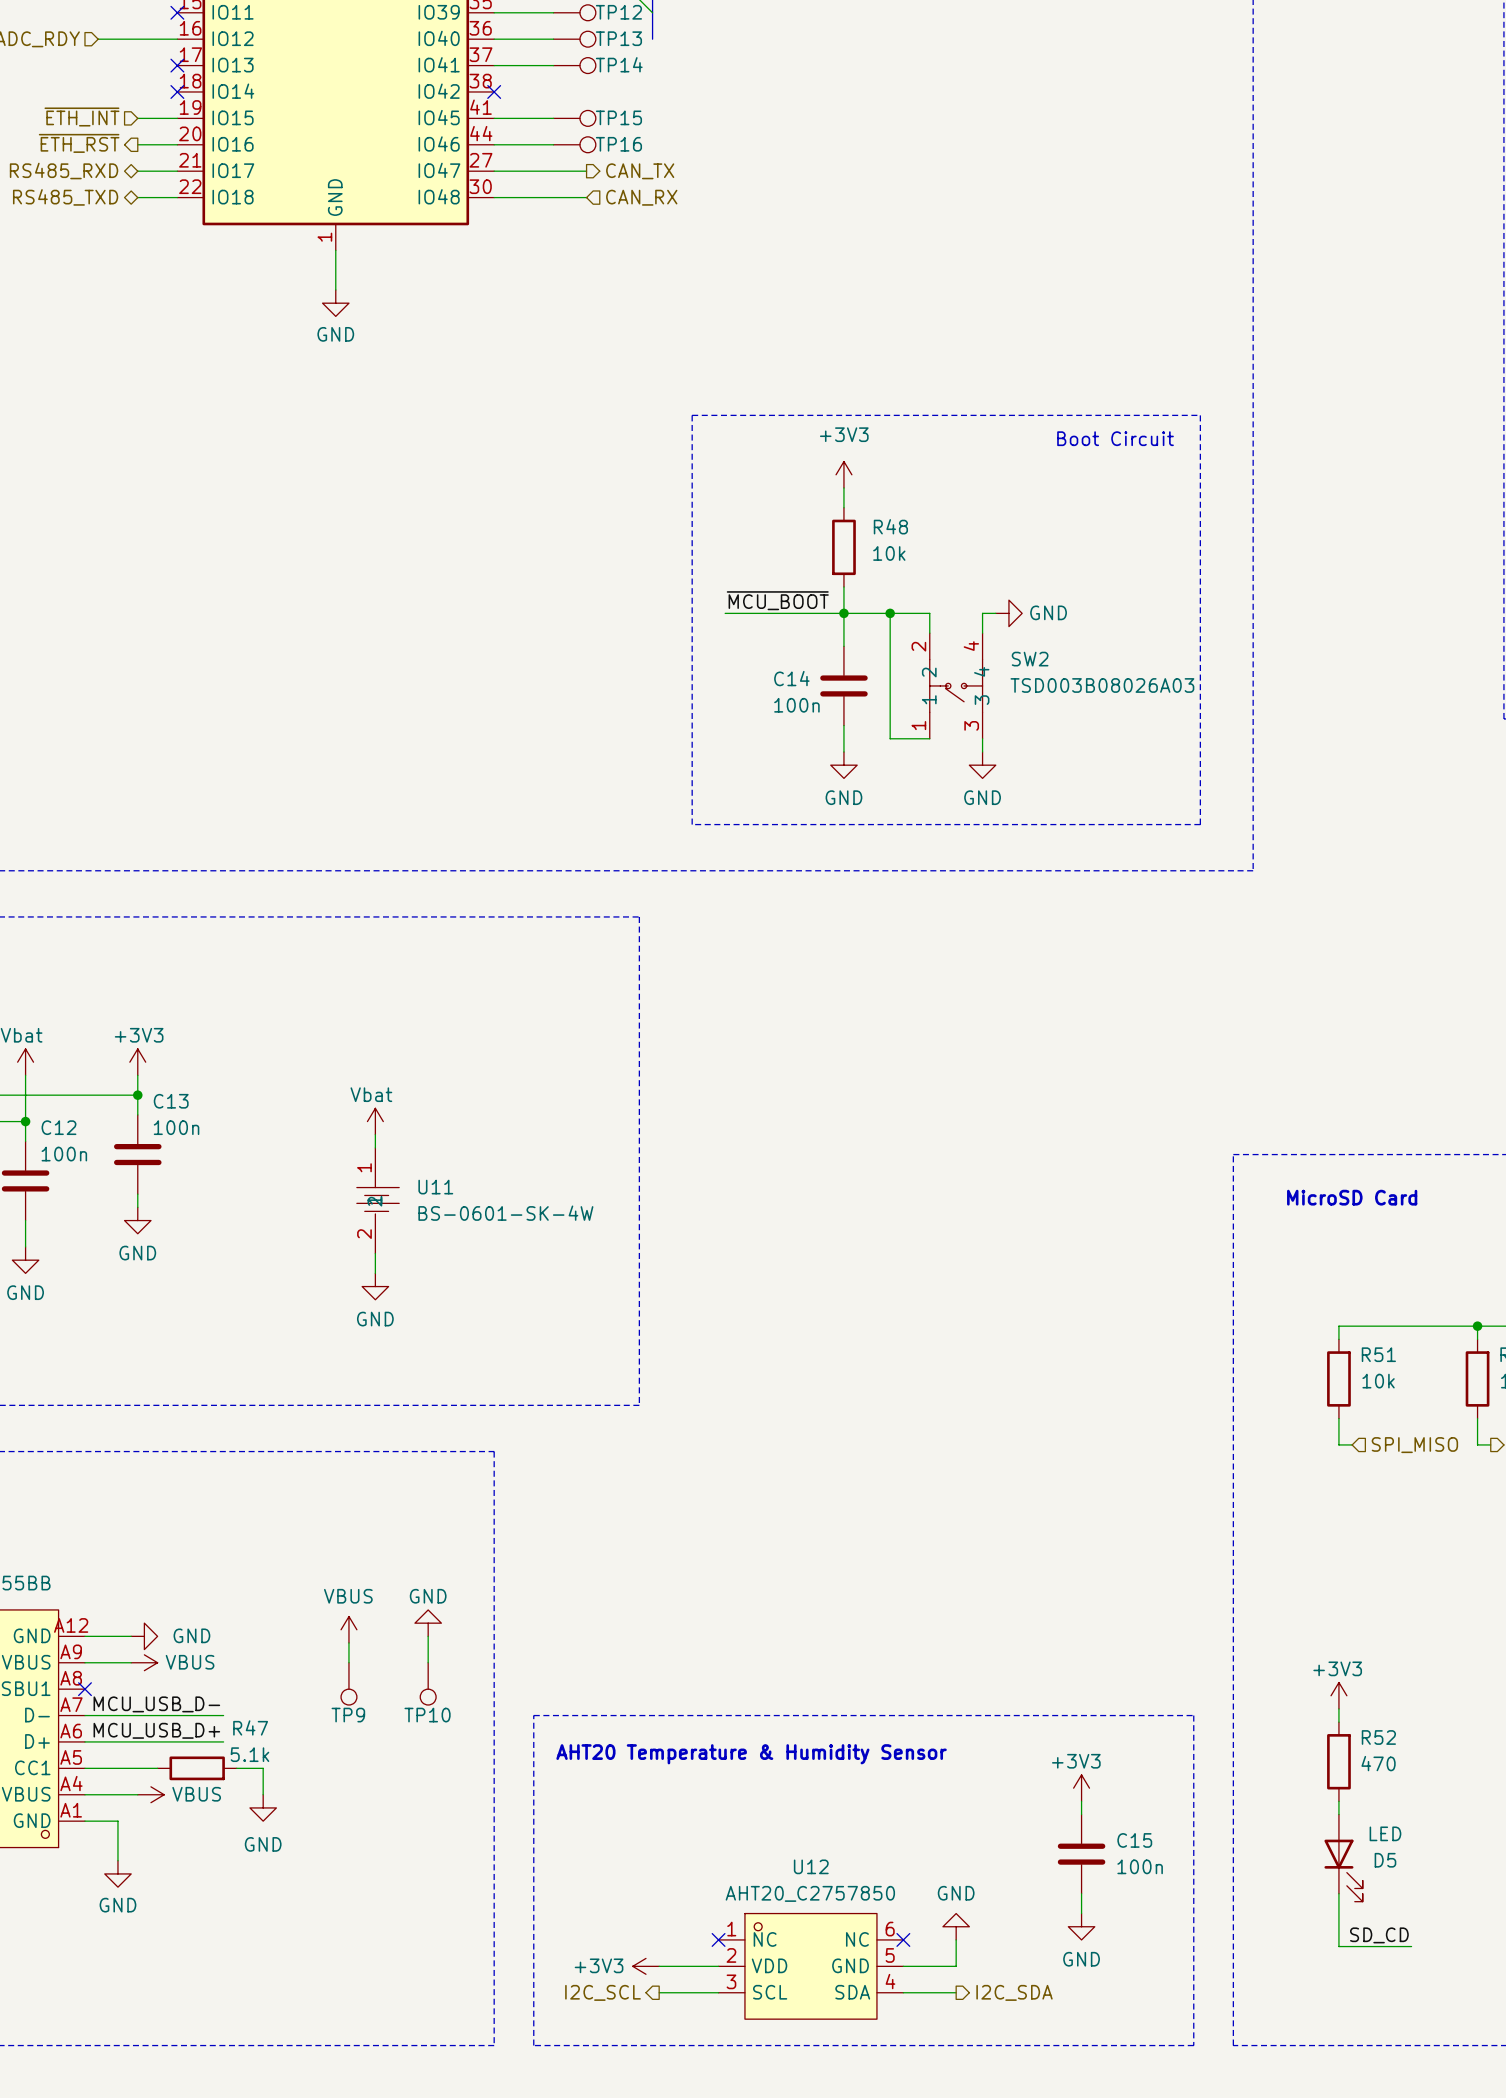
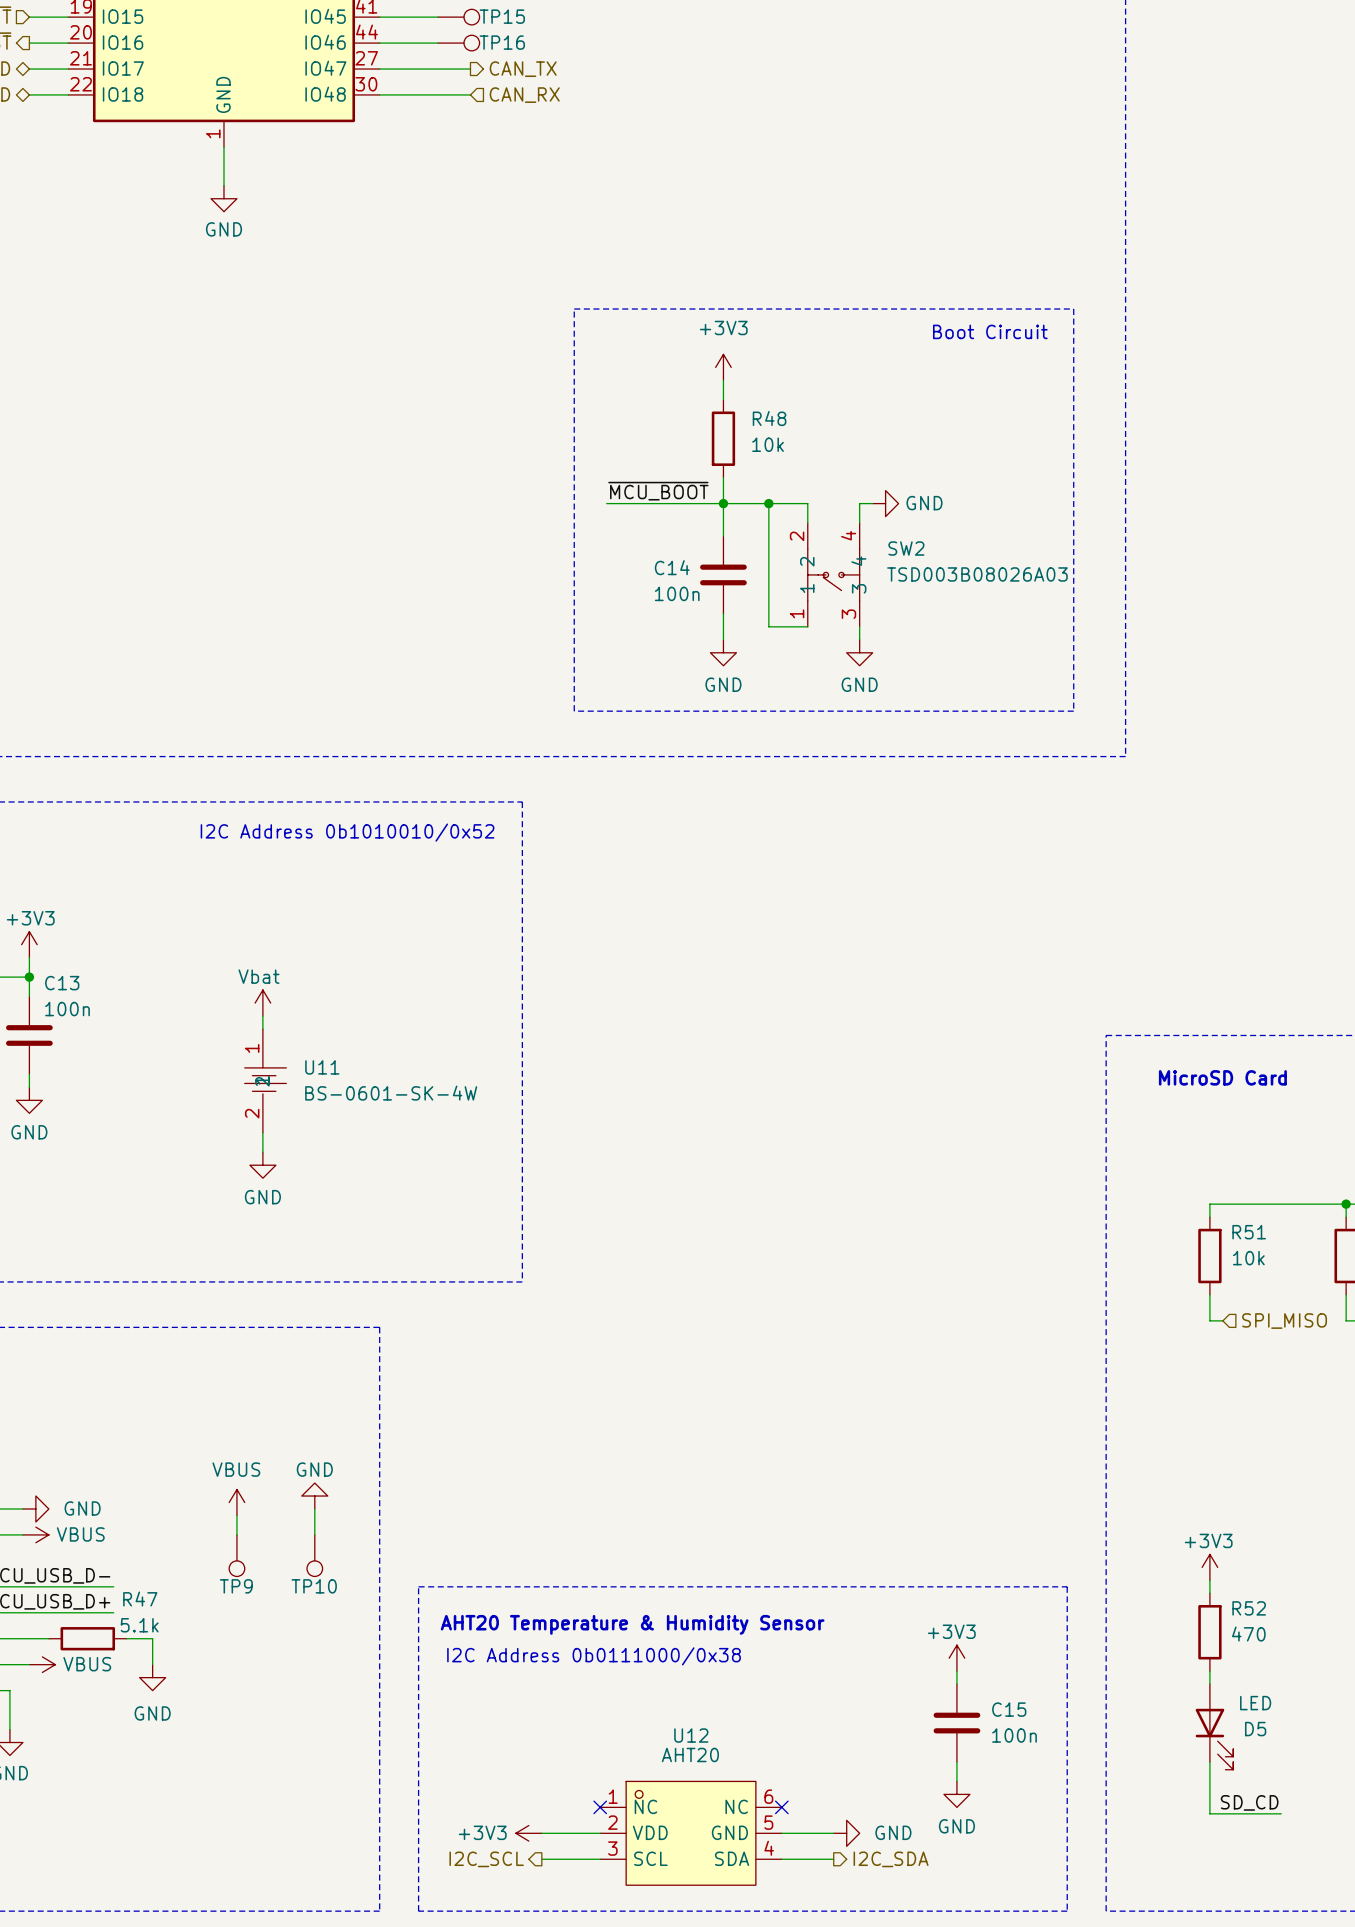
text: none -> I2C Address 0b1010010/0x52 (347, 832)
text: none -> I2C Address 0b0111000/0x38 (594, 1656)
U12 value: AHT20_C2757850 (810, 1893) -> AHT20 (690, 1754)
power symbol rotation: 0° (956, 1926) -> 90° clockwise (846, 1833)
power symbol position: GND (956, 1926) -> GND (846, 1833)
wire: (956, 1939) (956, 1966) -> none

